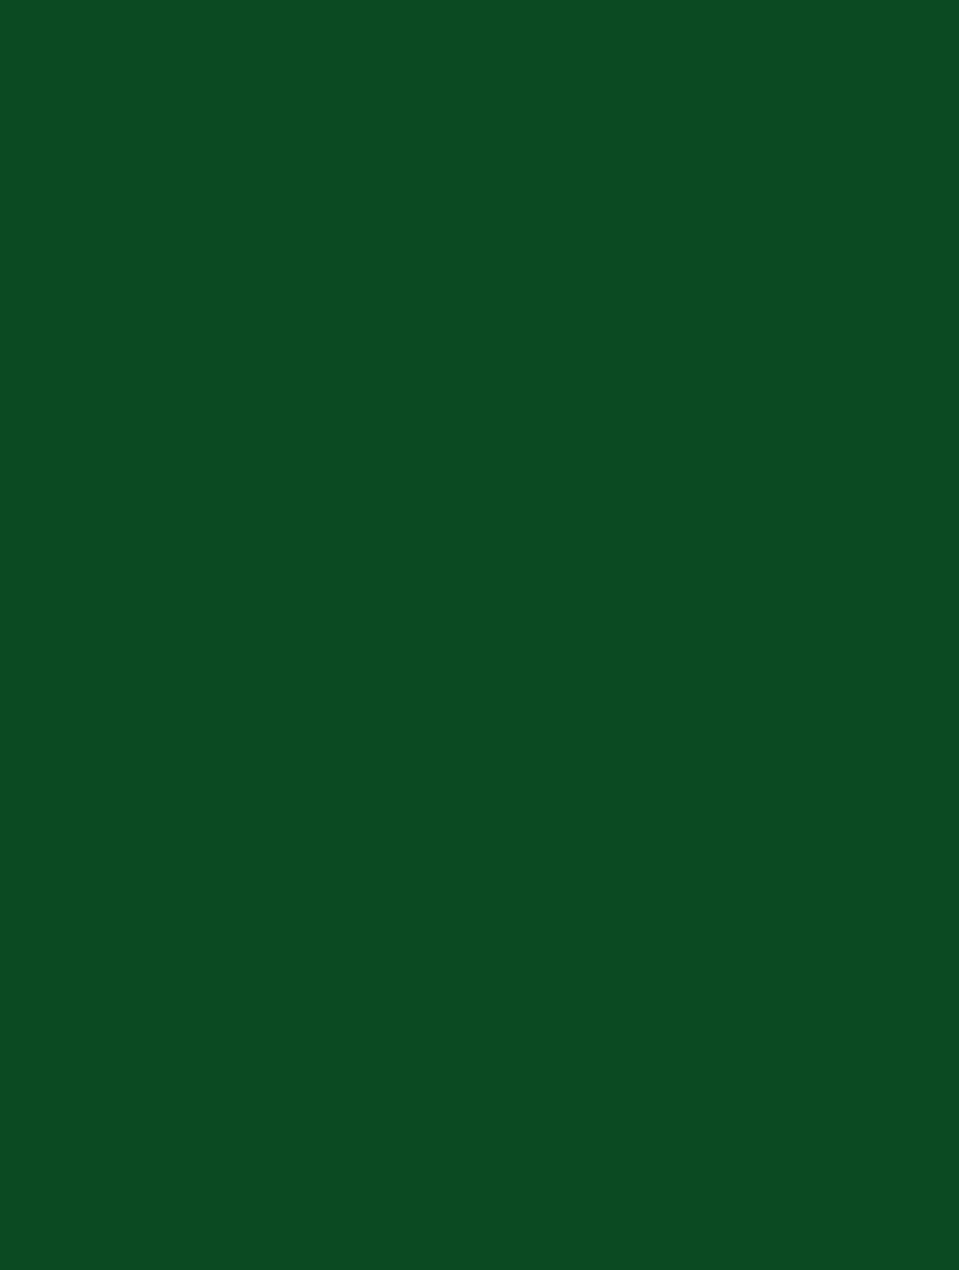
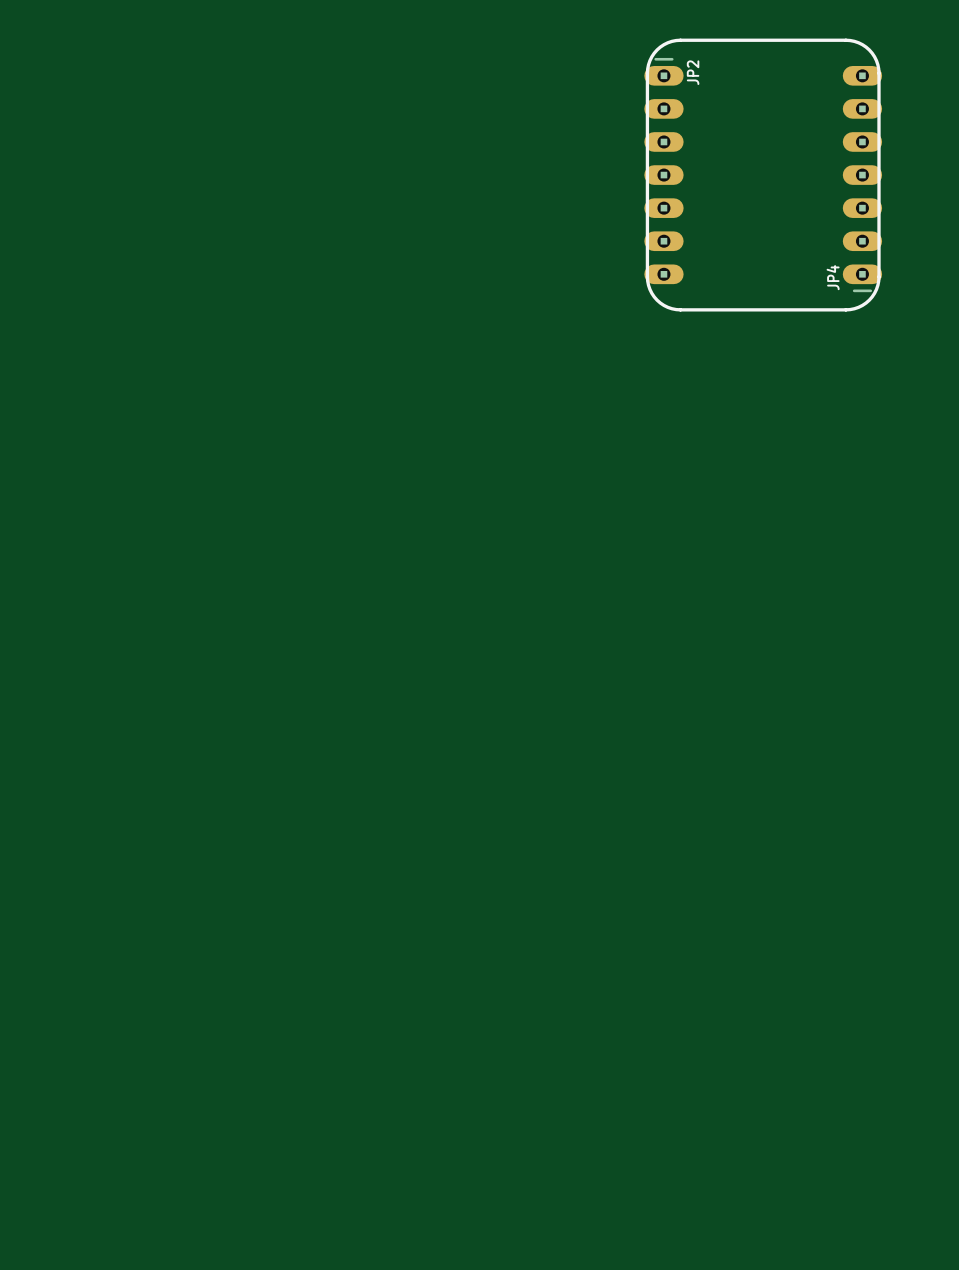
line: none -> (680, 40) (850, 40) (862, 44) (872, 53) (877, 64) (878, 73) (878, 276) (876, 289) (866, 303) (854, 308) (845, 309) (680, 309) (667, 307) (654, 296) (648, 285) (647, 276) (647, 69) (649, 60) (657, 49) (667, 42) (680, 40)
JP2: none -> (663, 171)
JP4: none -> (862, 179)

